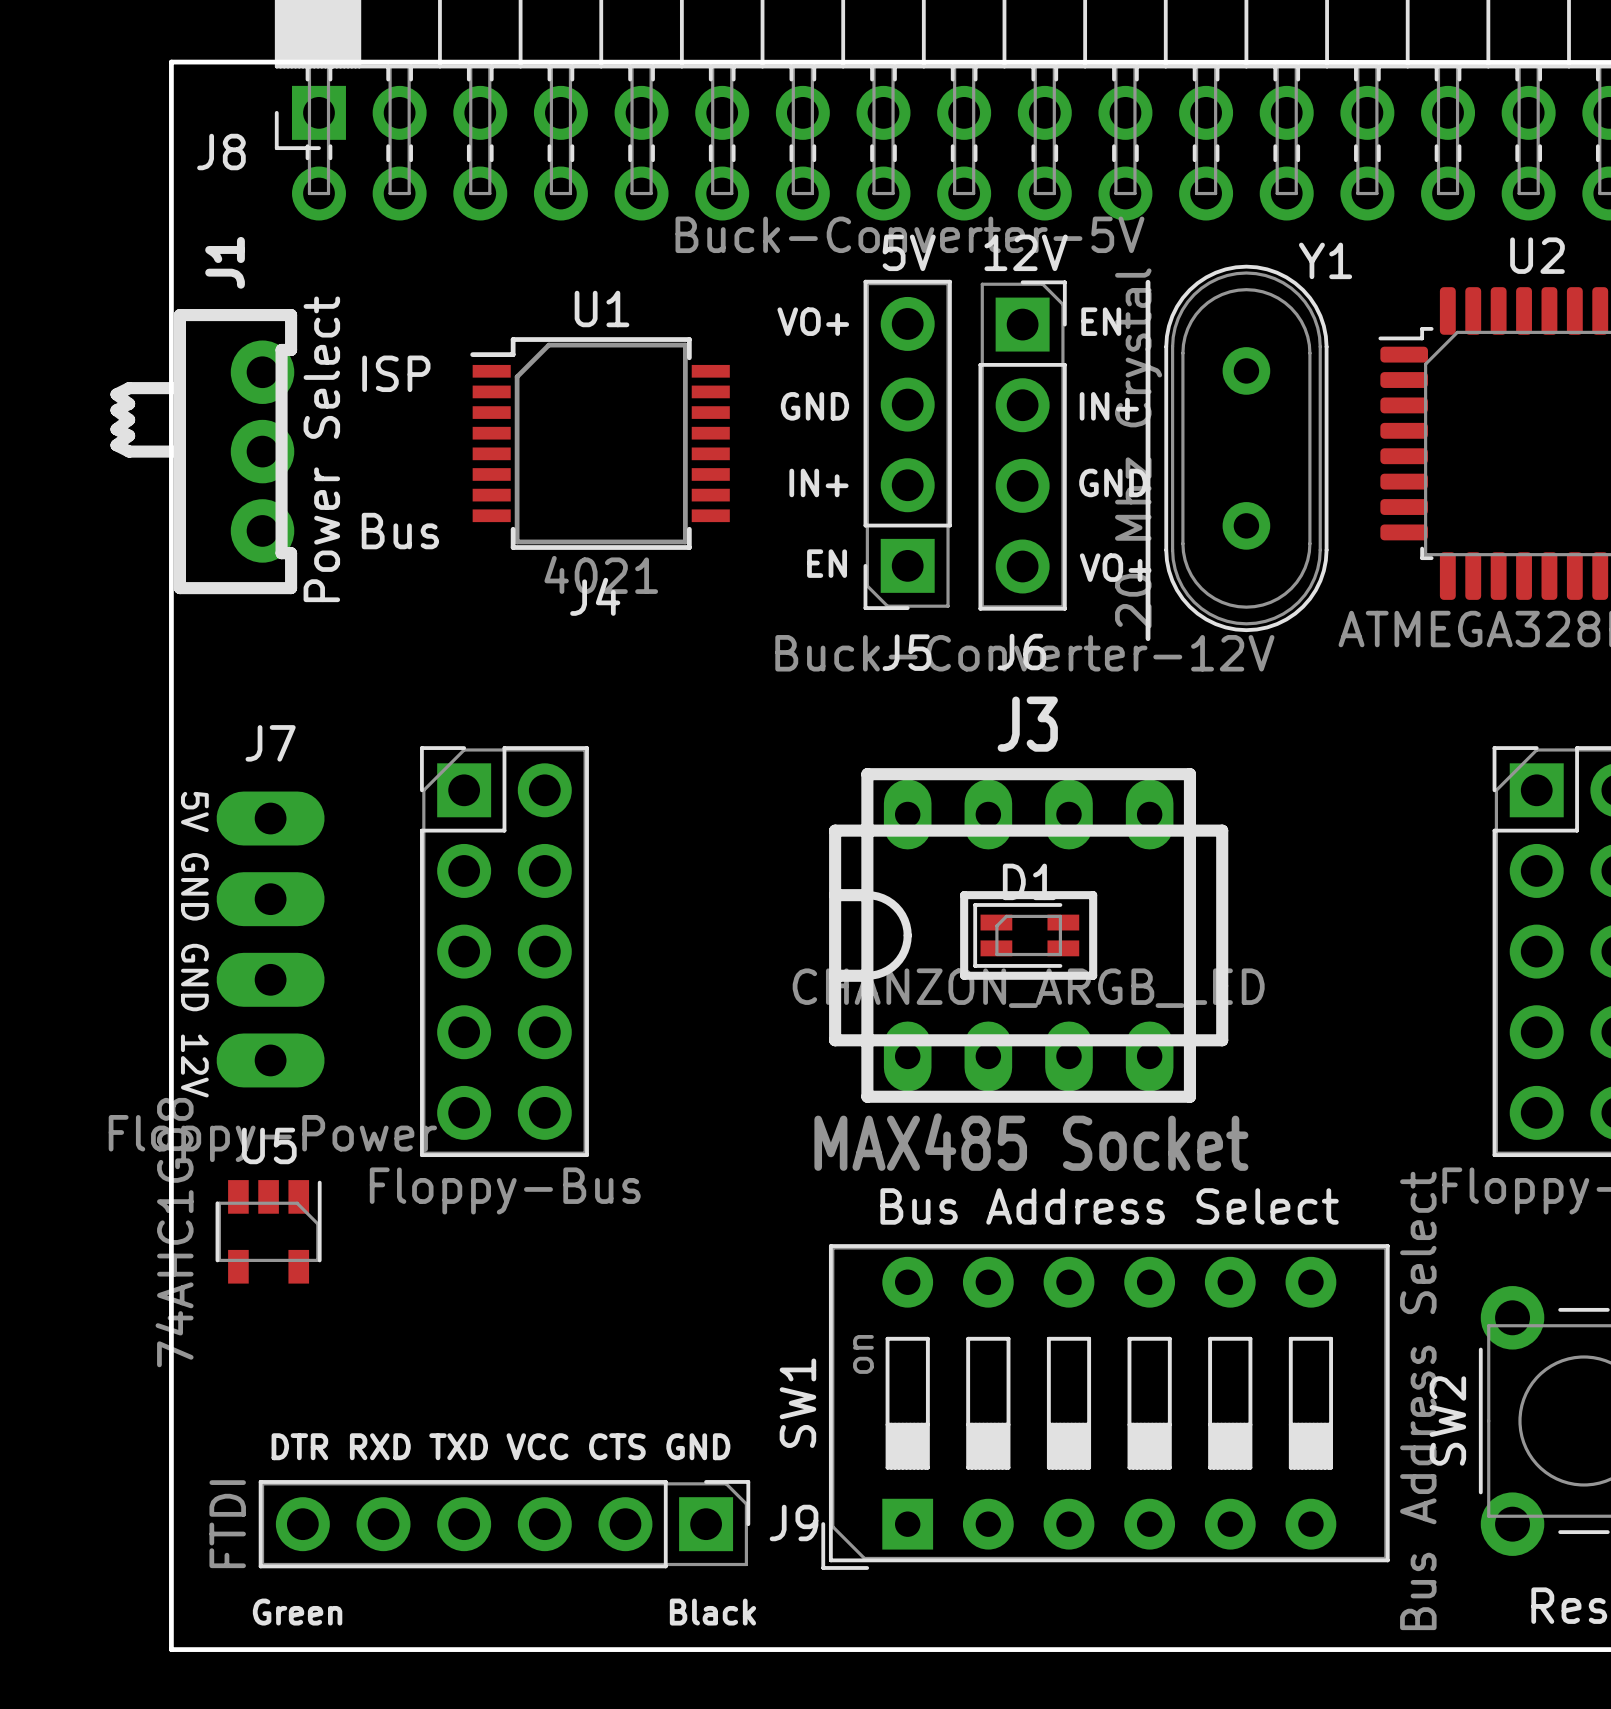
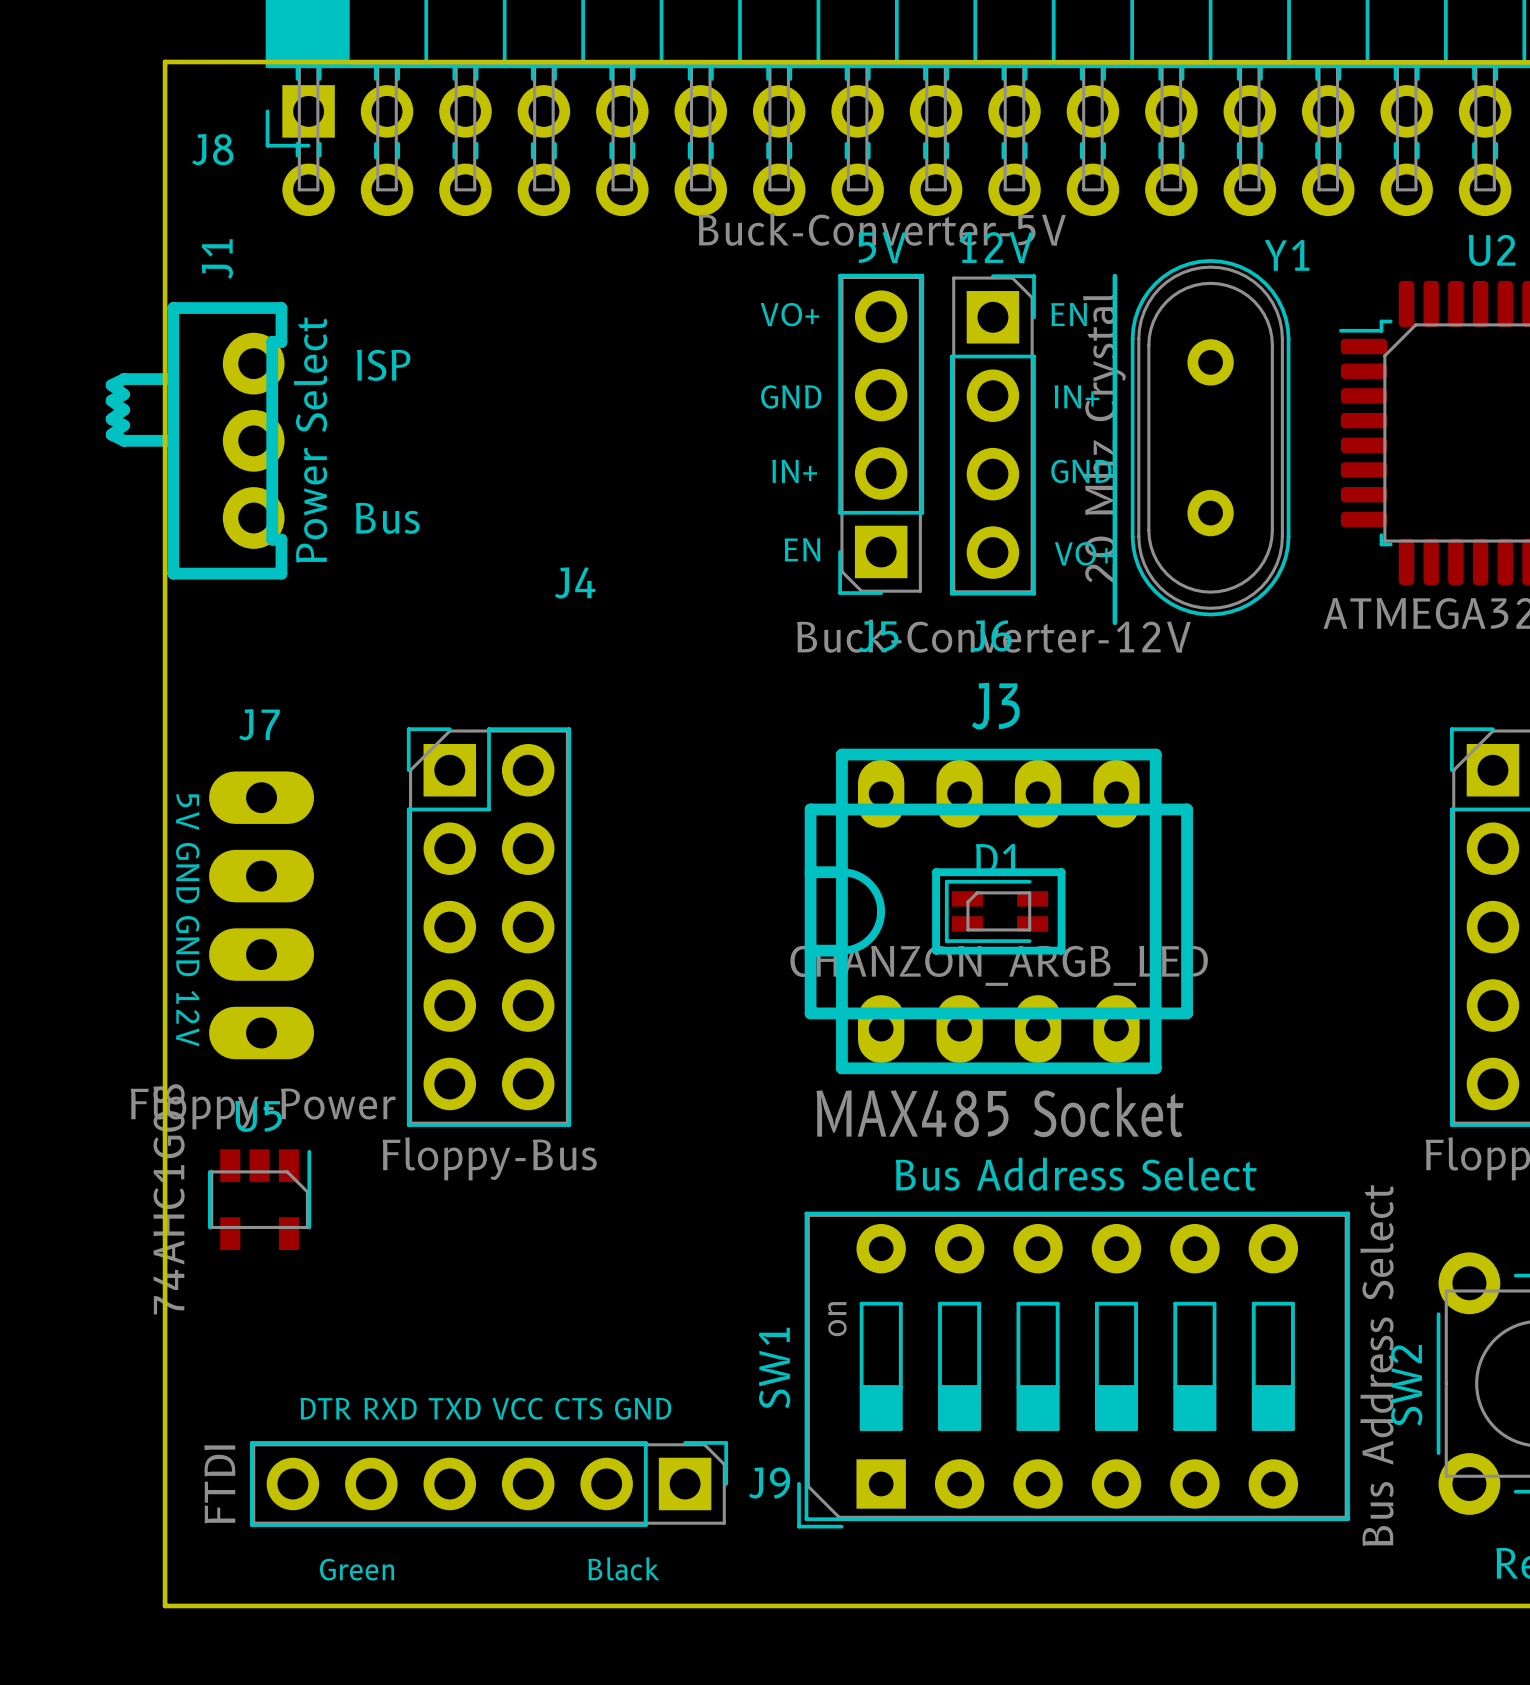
U1: 4021 (600, 443) -> none

